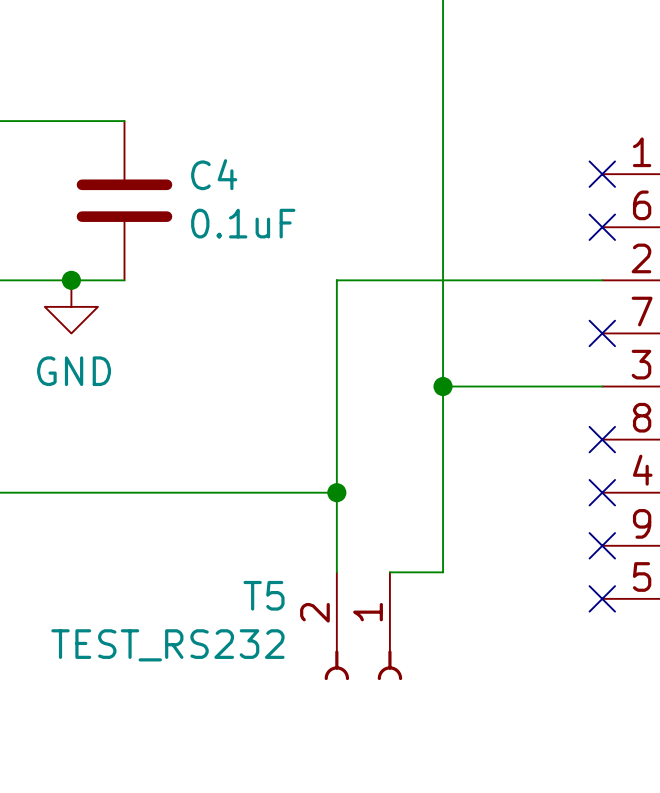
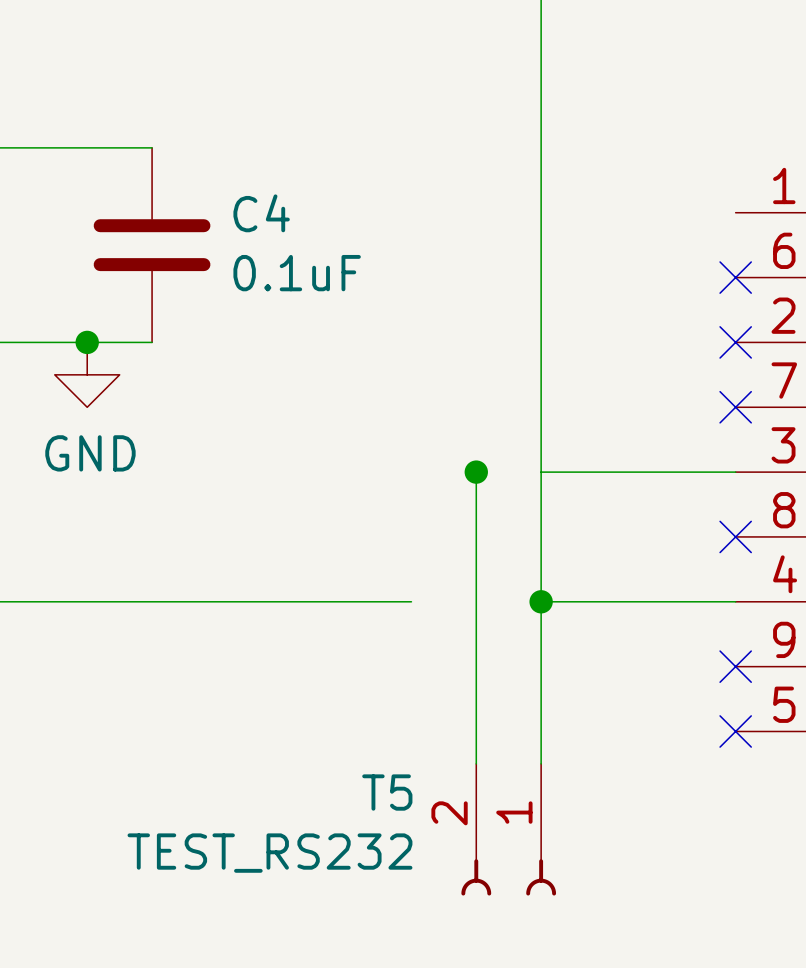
no-connect mark: (602, 174) -> none
wire: (602, 280) (336, 280) (336, 572) -> none
no-connect mark: none -> (735, 342)
wire: none -> (476, 472) (476, 763)
junction: none -> (476, 472)
junction: (443, 386) -> none
junction: (336, 492) -> none
wire: none -> (541, 601) (735, 601)
junction: none -> (541, 601)
no-connect mark: (602, 492) -> none
wire: (389, 572) (443, 572) -> (541, 763) (541, 699)
T5 position: (363, 626) -> (508, 829)

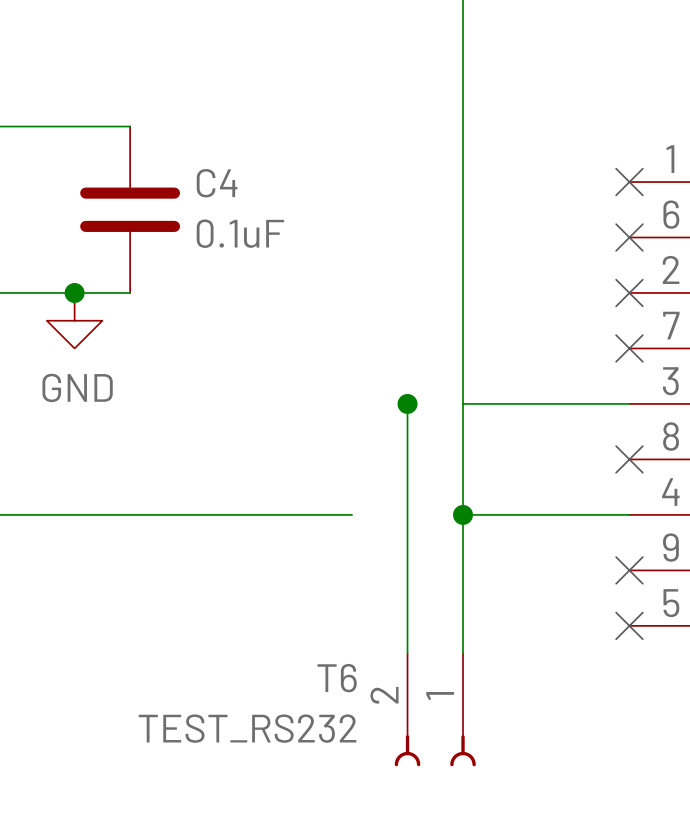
no-connect mark: none -> (629, 182)
T5 name: T5 (387, 792) -> T6 (337, 678)

